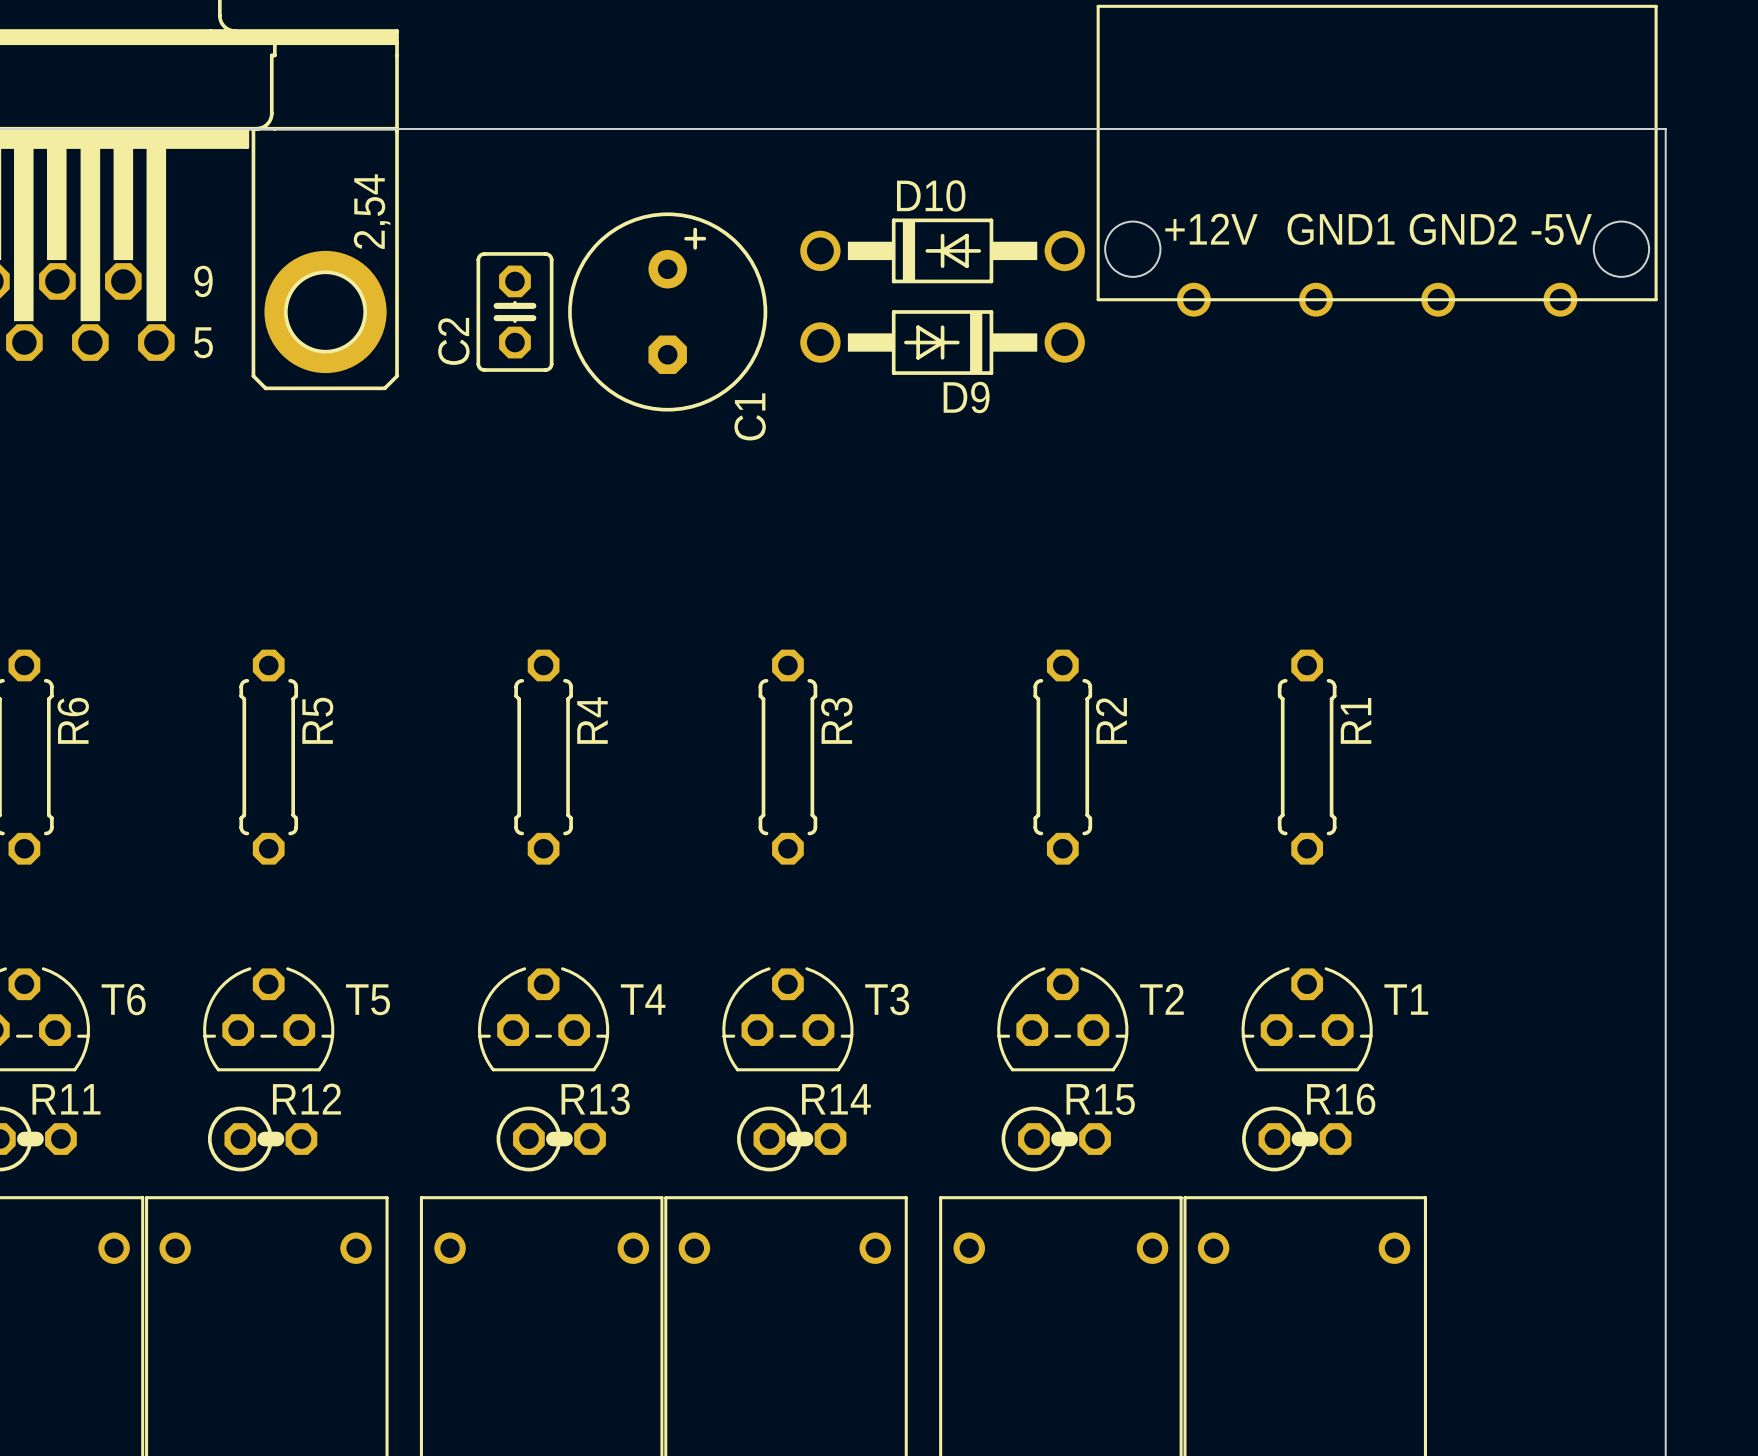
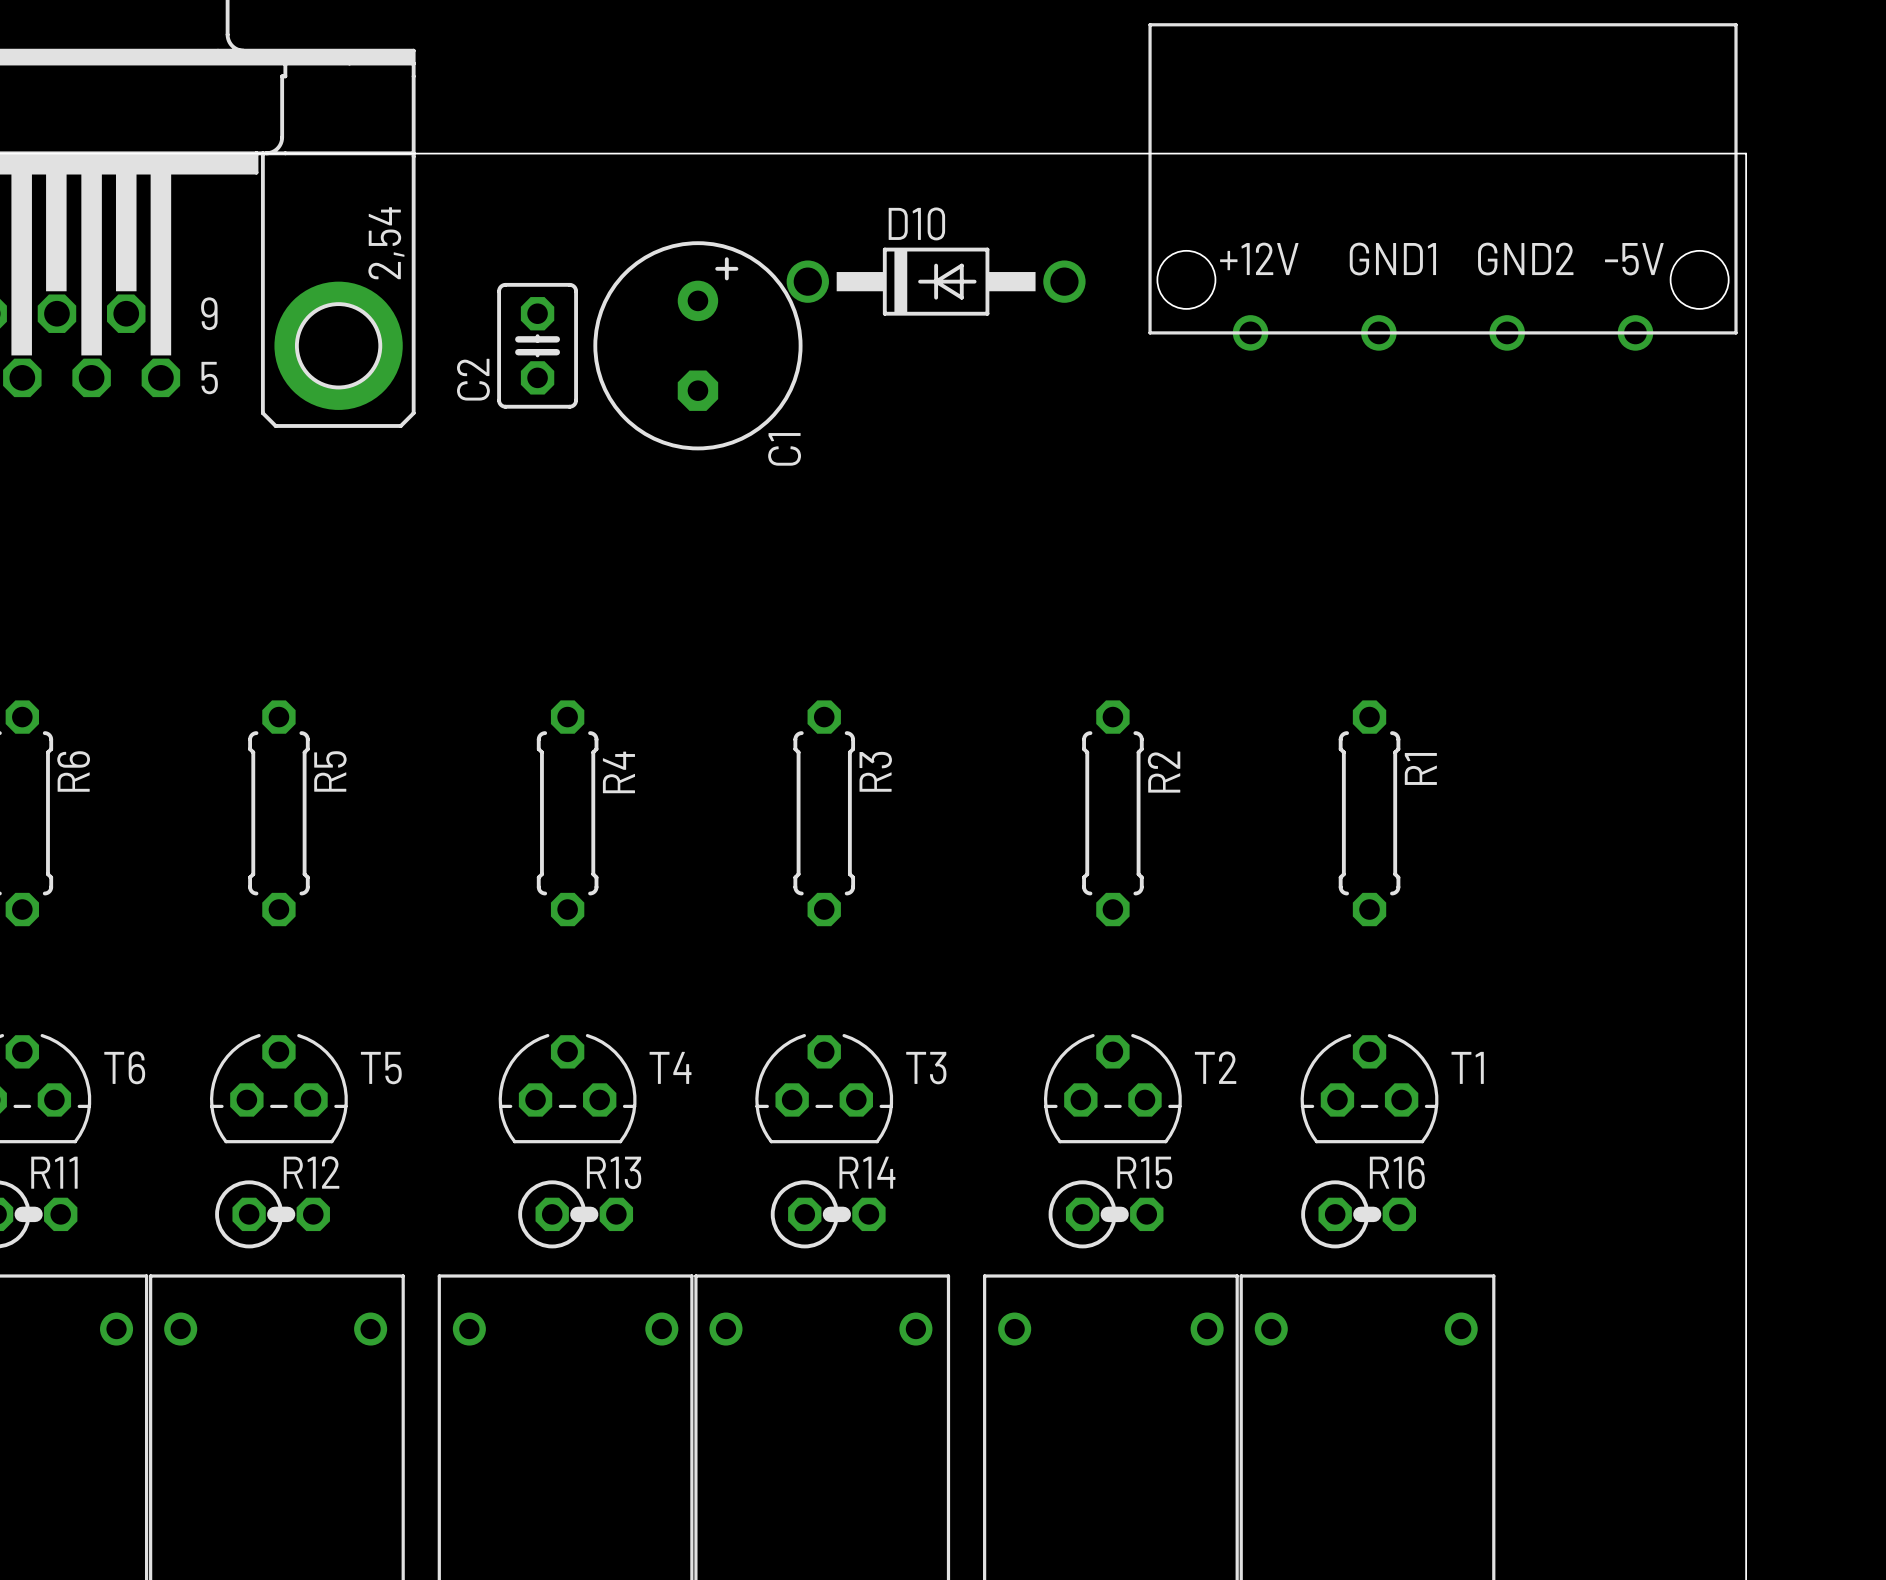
D10 position: (942, 250) -> (936, 281)
D9: (942, 342) -> none

